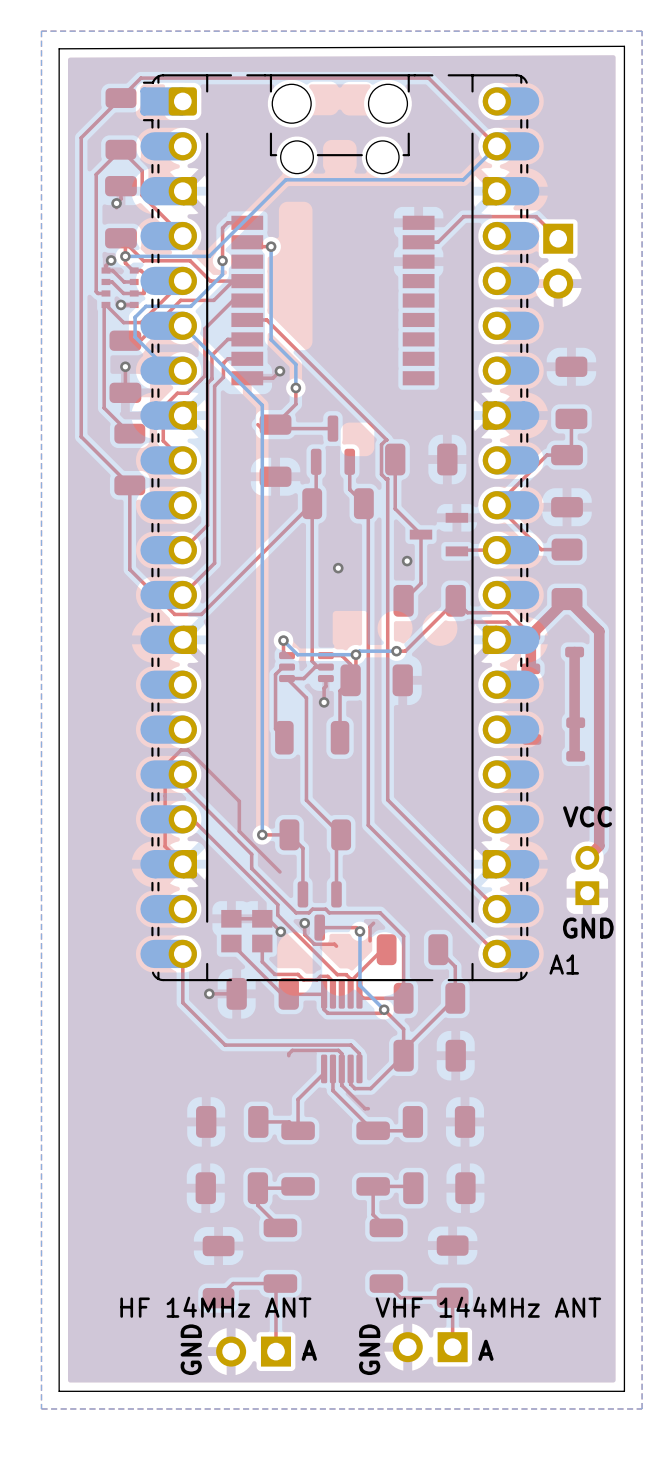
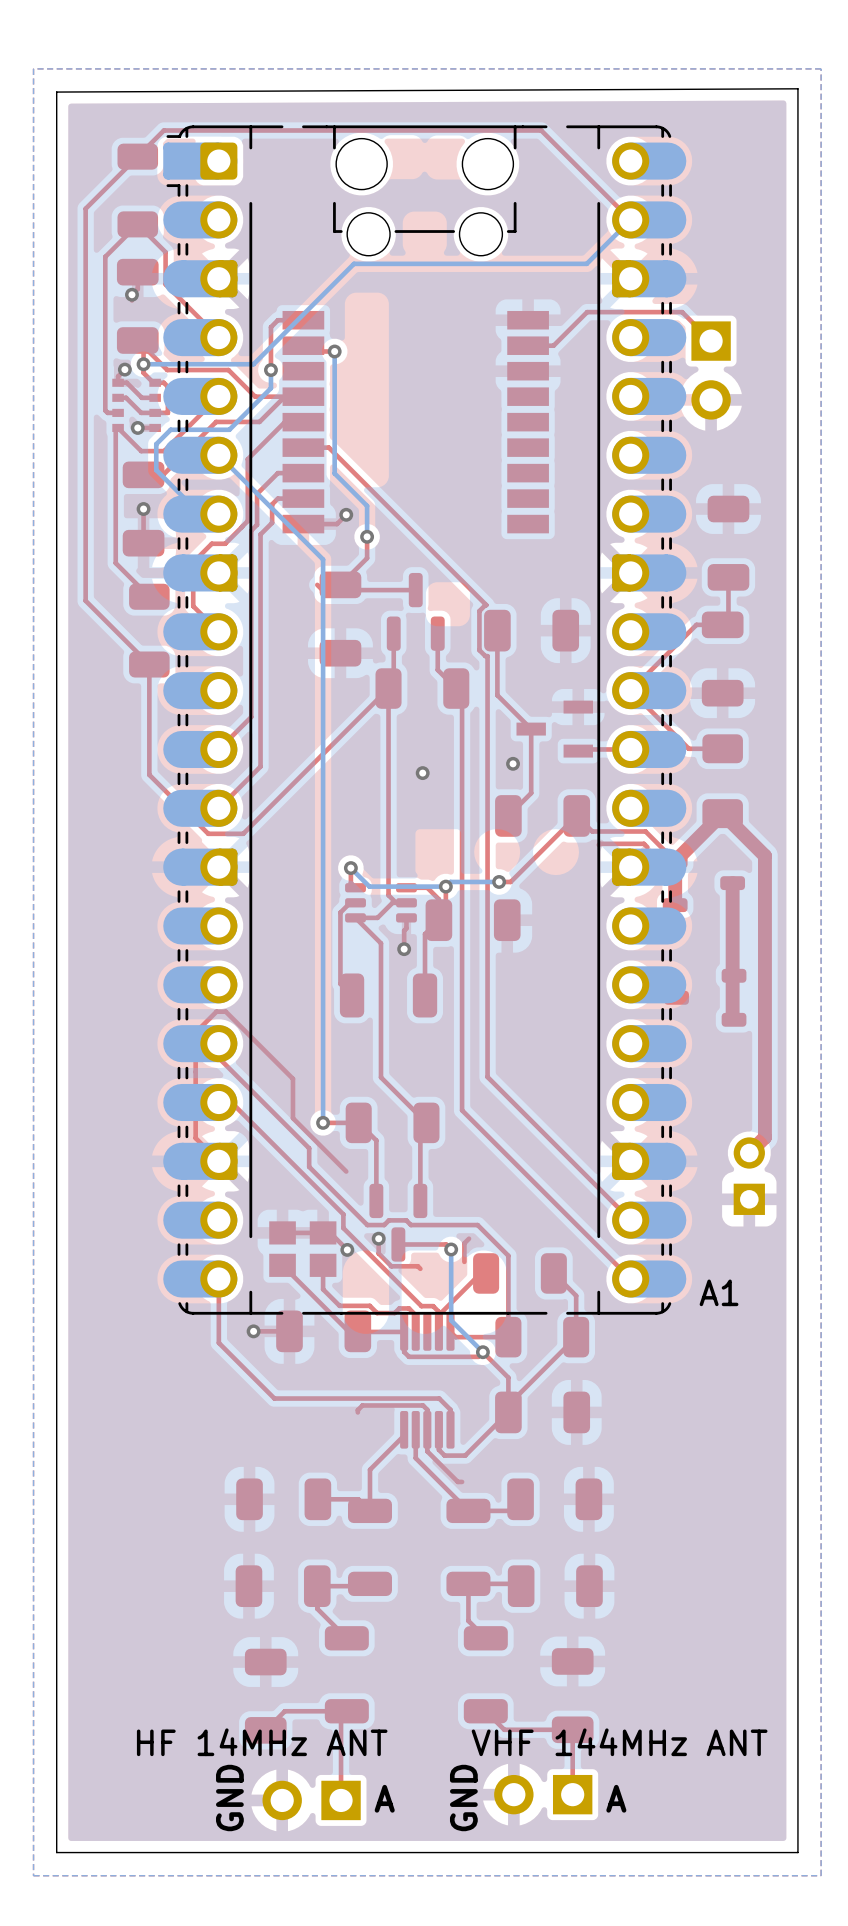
text: VCC (587, 816) -> none
text: GND (588, 928) -> none

